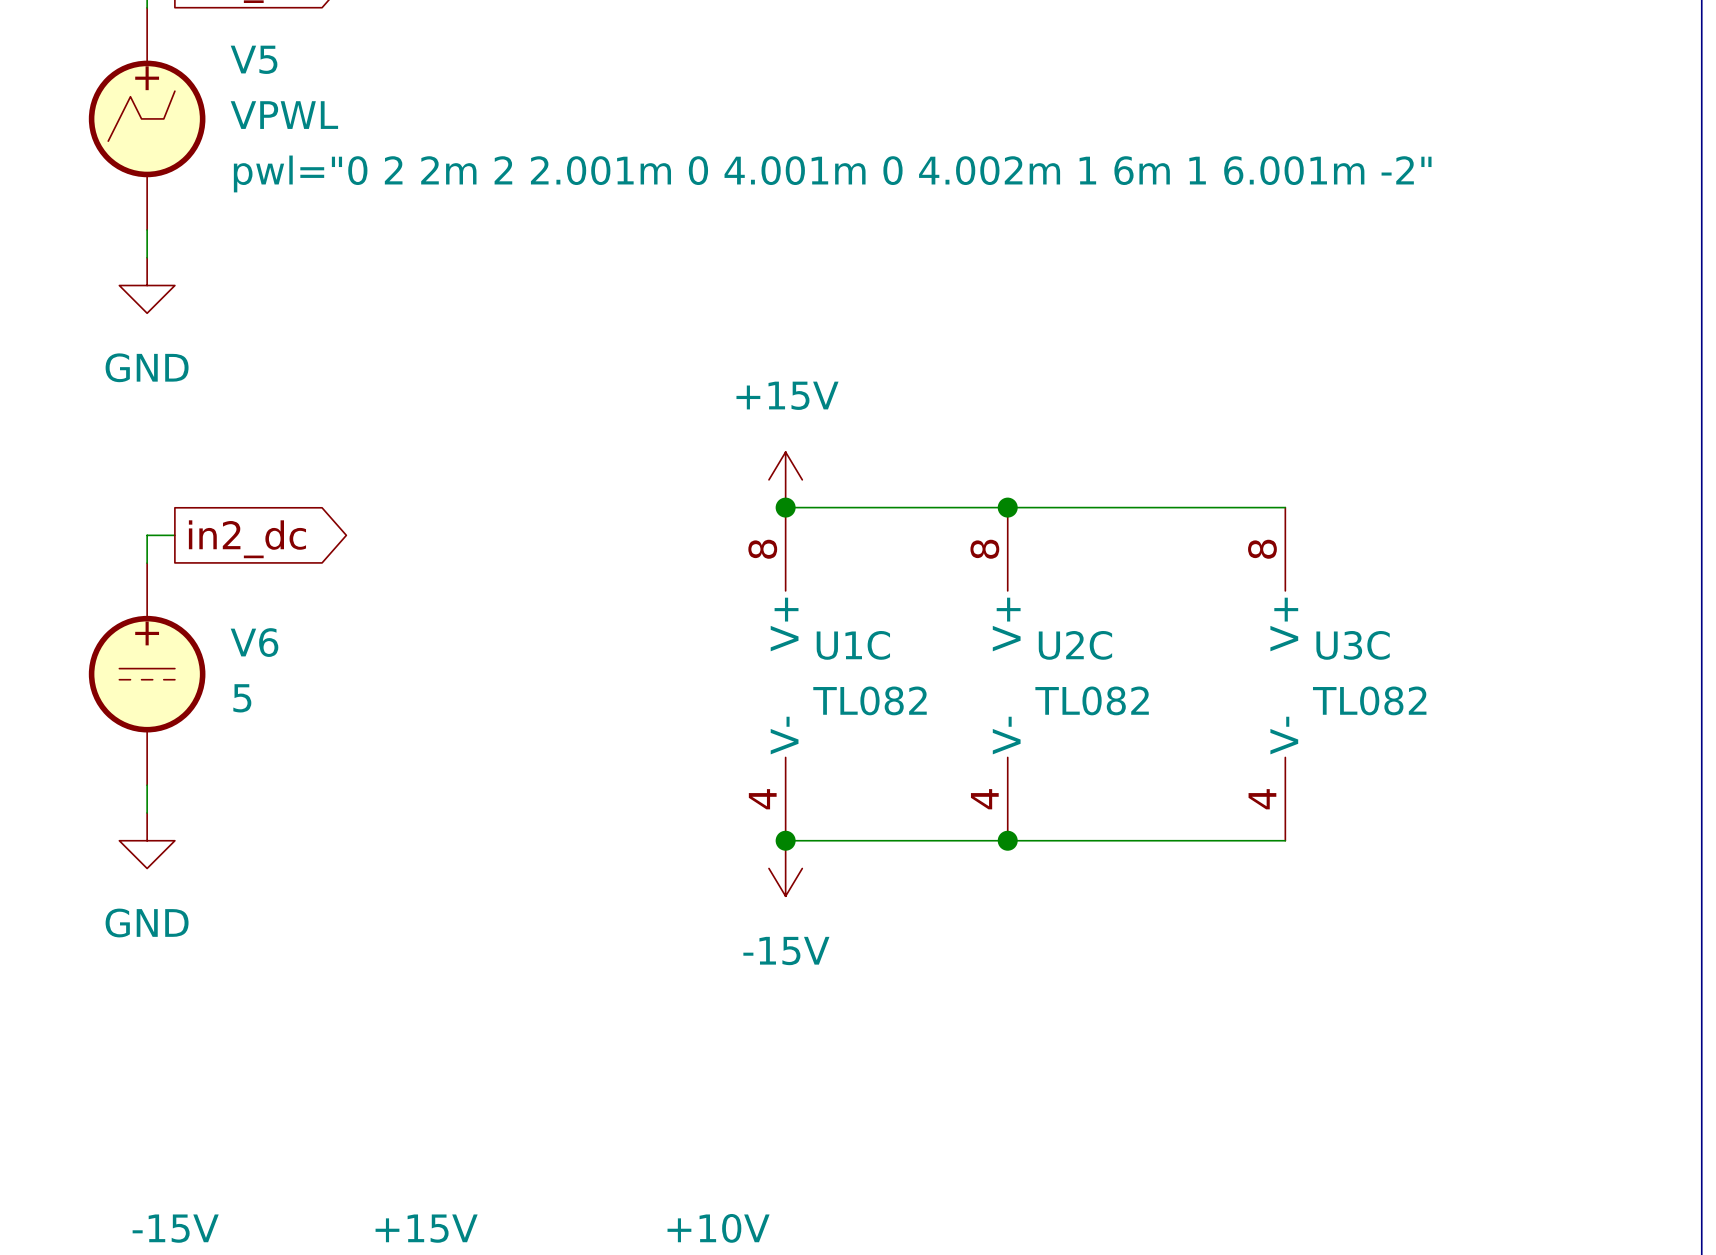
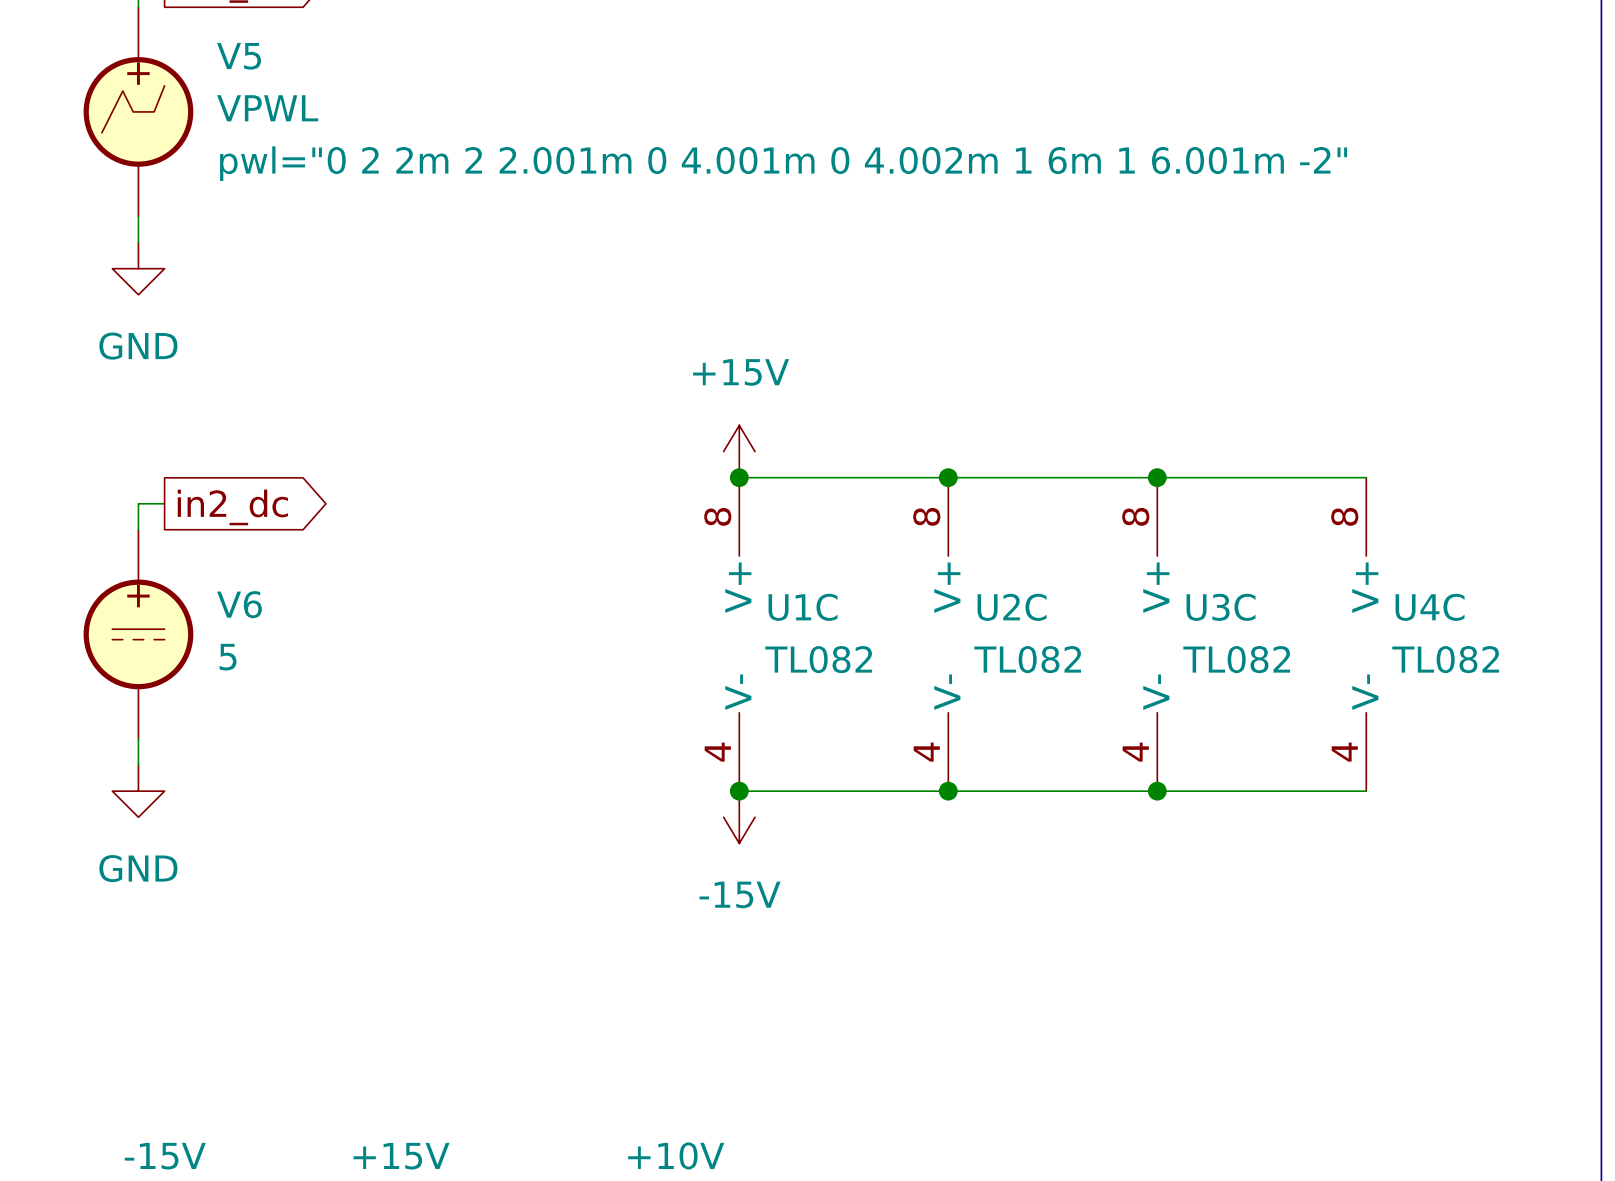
junction: none -> (1157, 477)
wire: none -> (1209, 477) (1366, 477)
U3C position: (1285, 674) -> (1157, 634)
U4C: none -> TL082 (1366, 634)
junction: none -> (1157, 791)
wire: none -> (1209, 791) (1366, 791)

